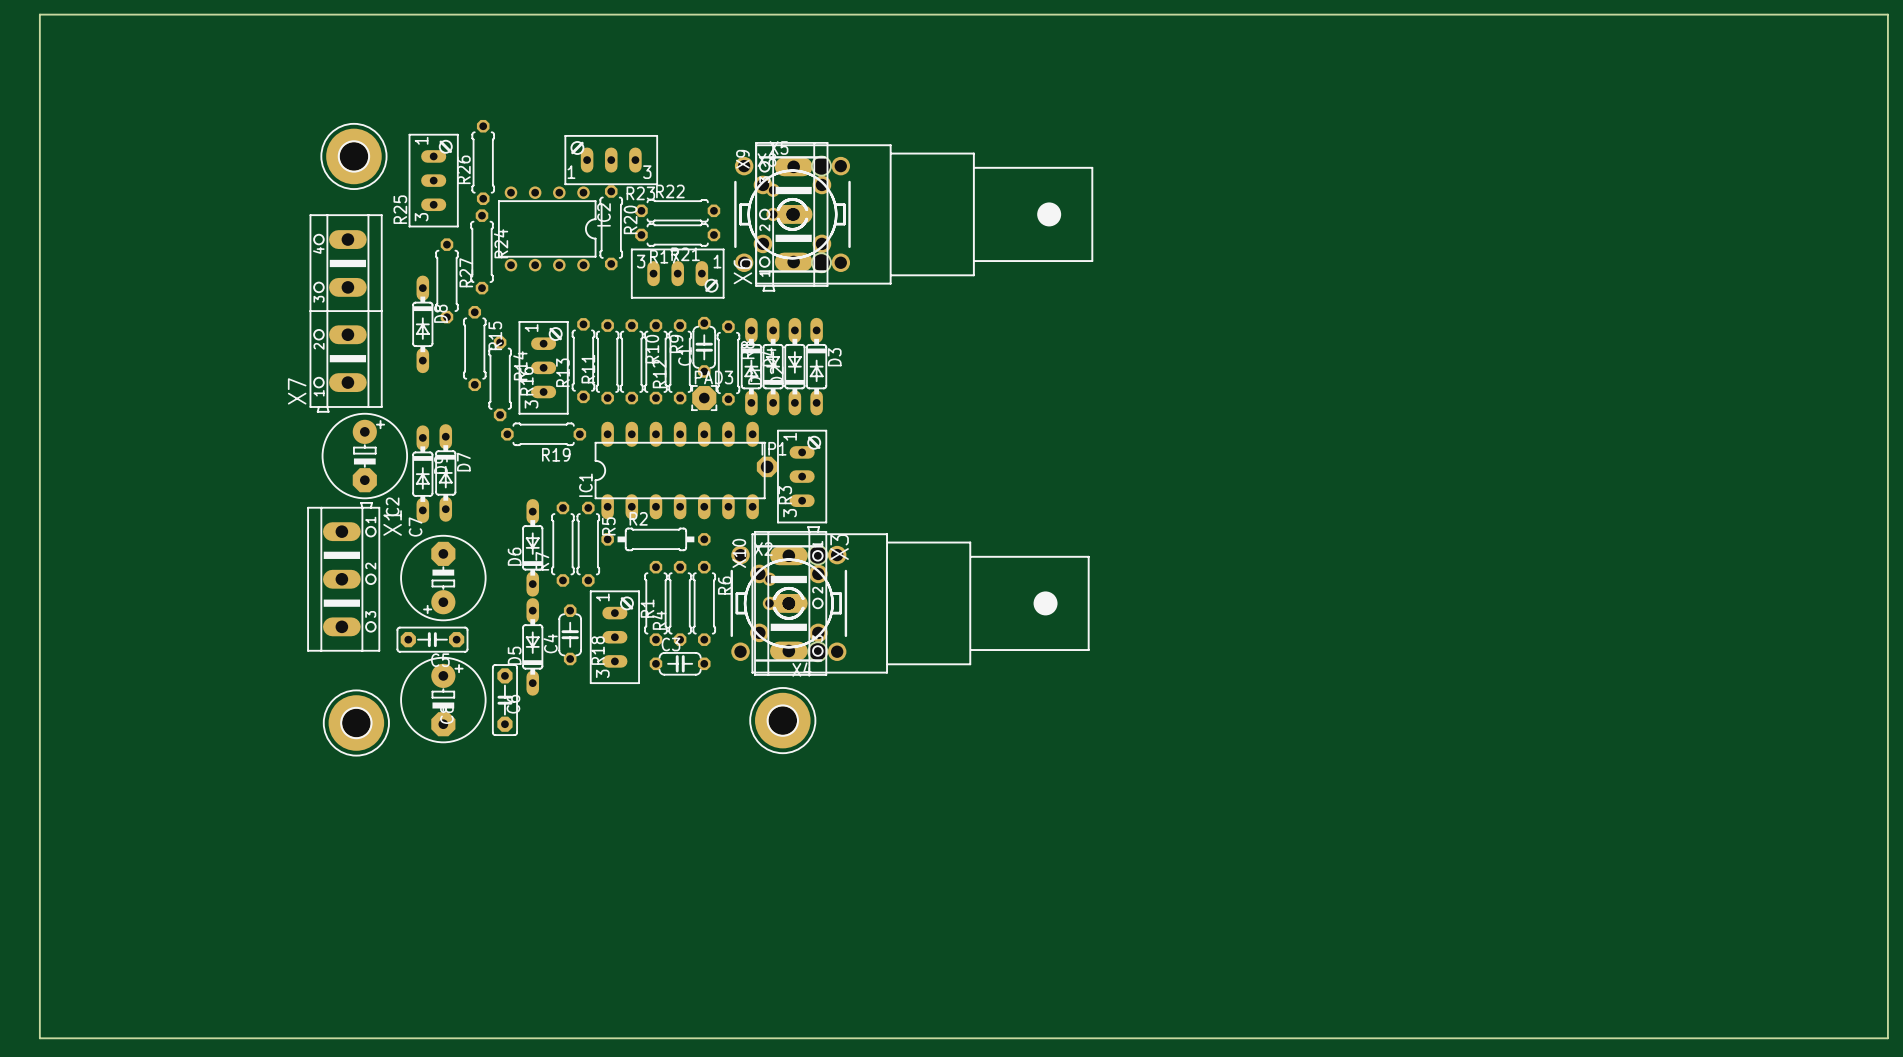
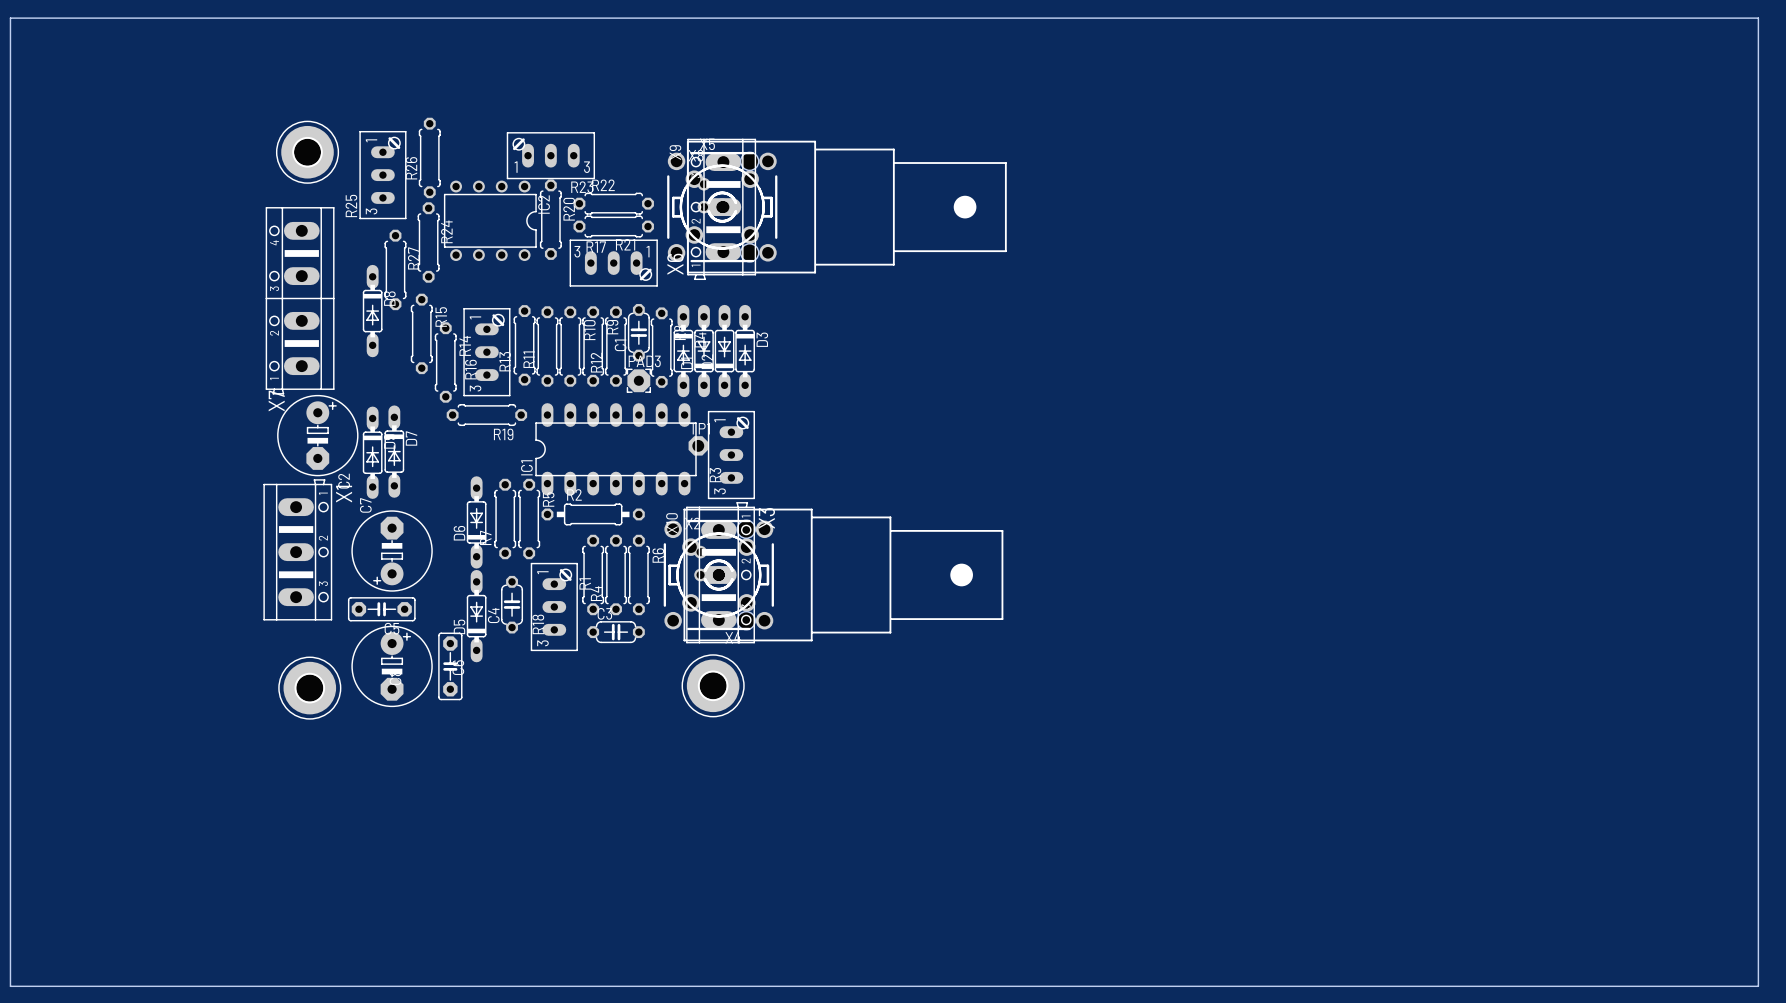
X7 name position: X7 (297, 391) -> X7 (276, 400)

